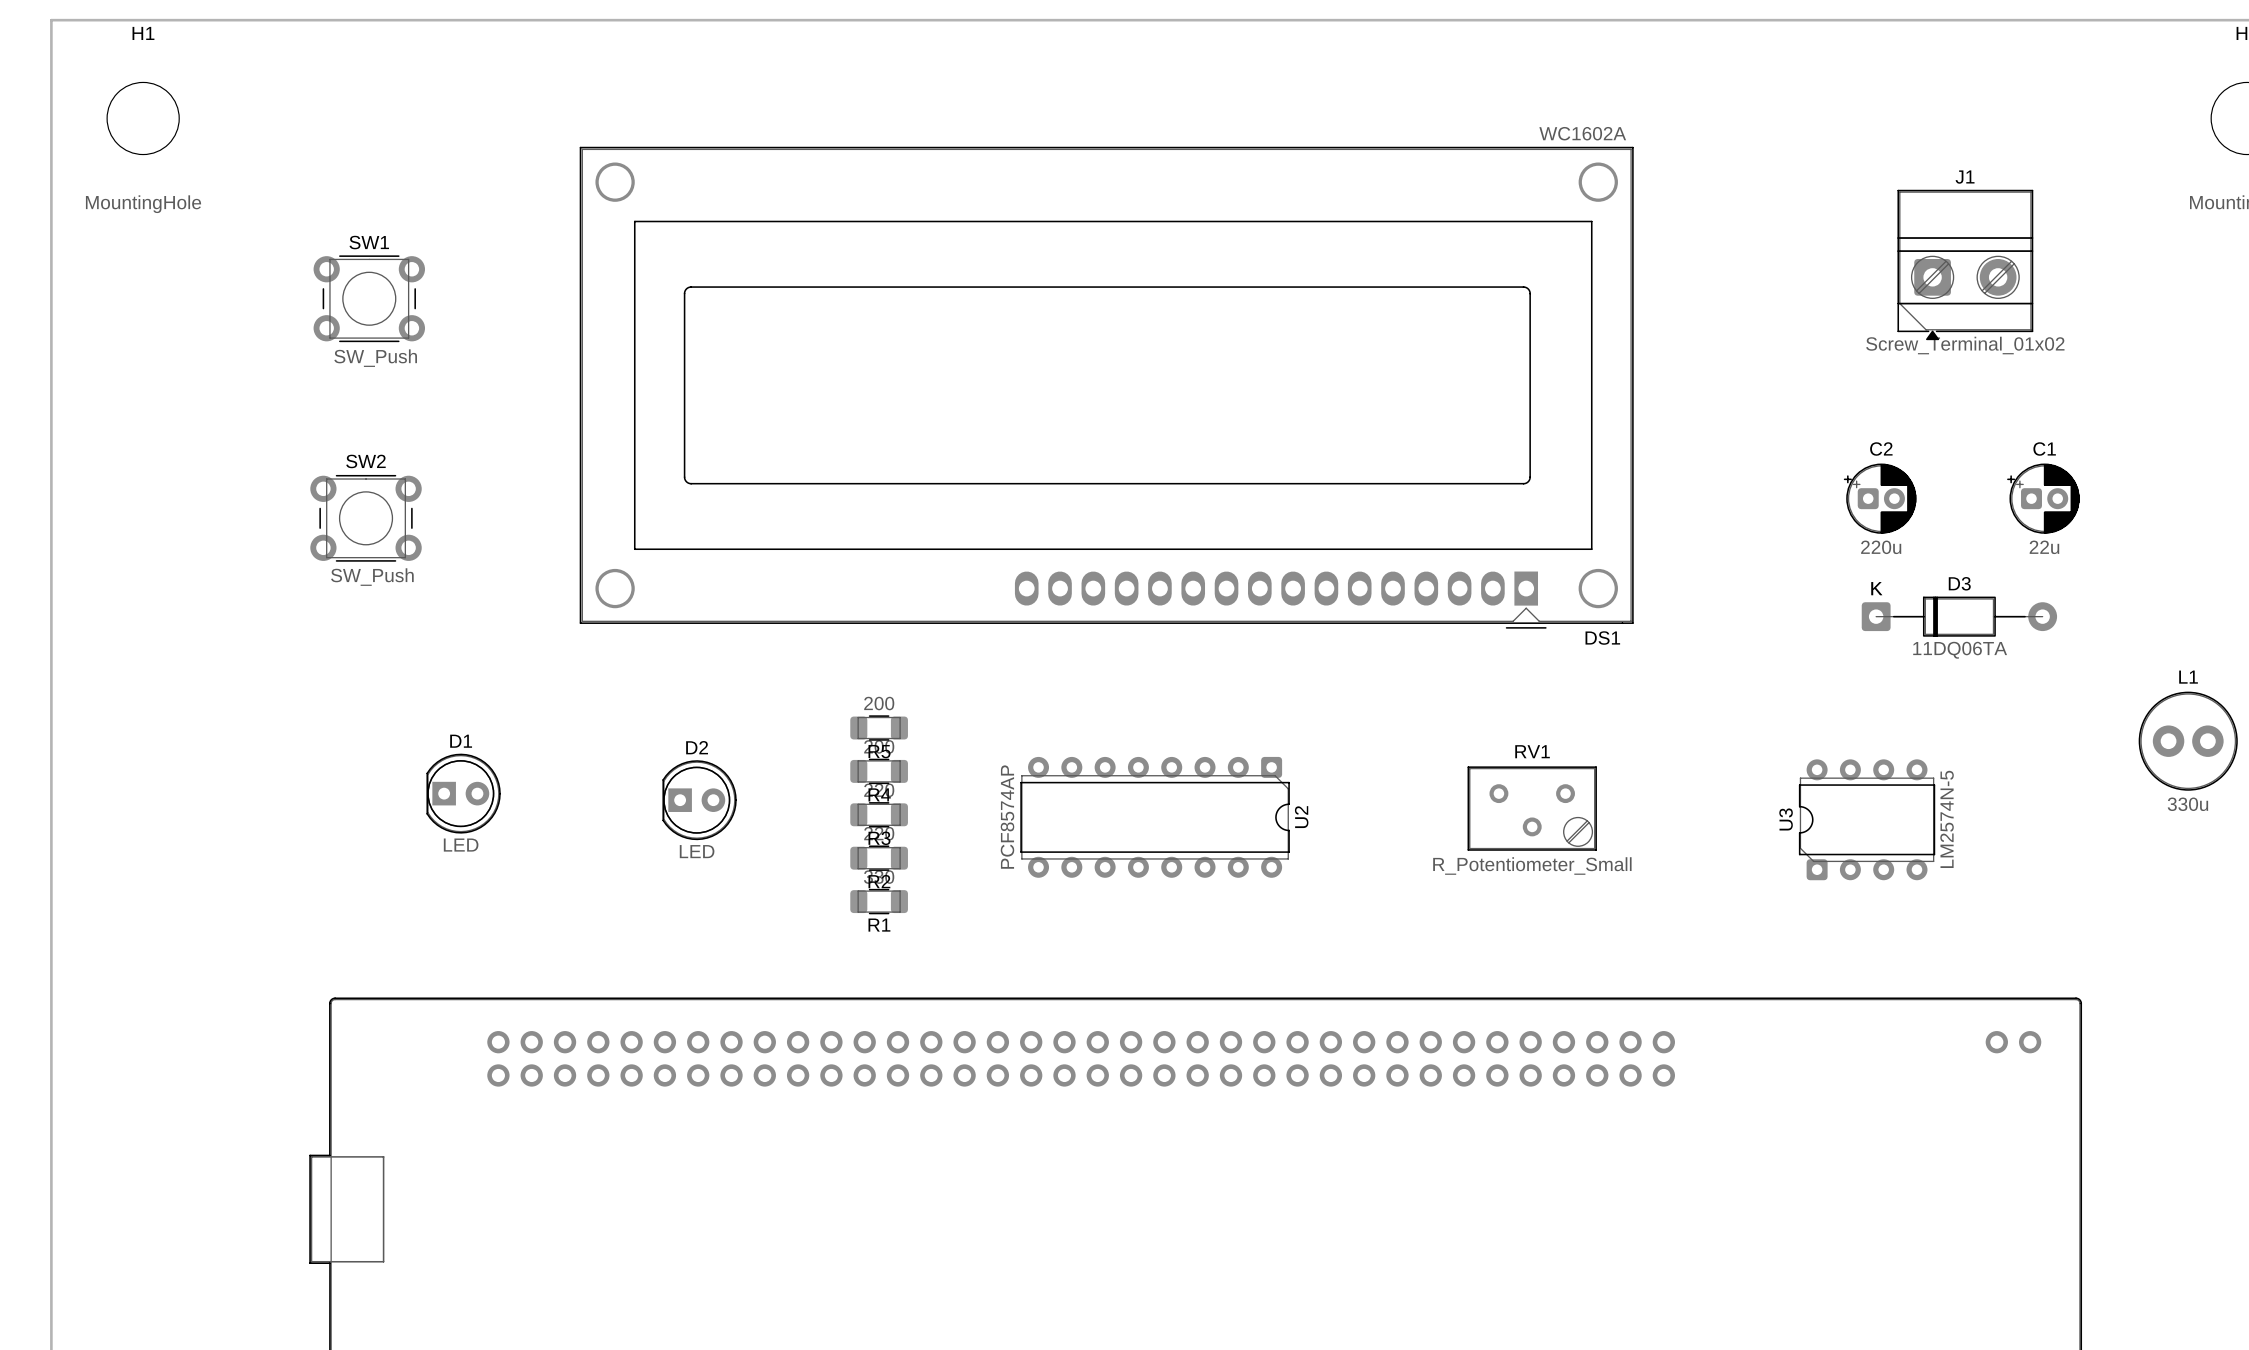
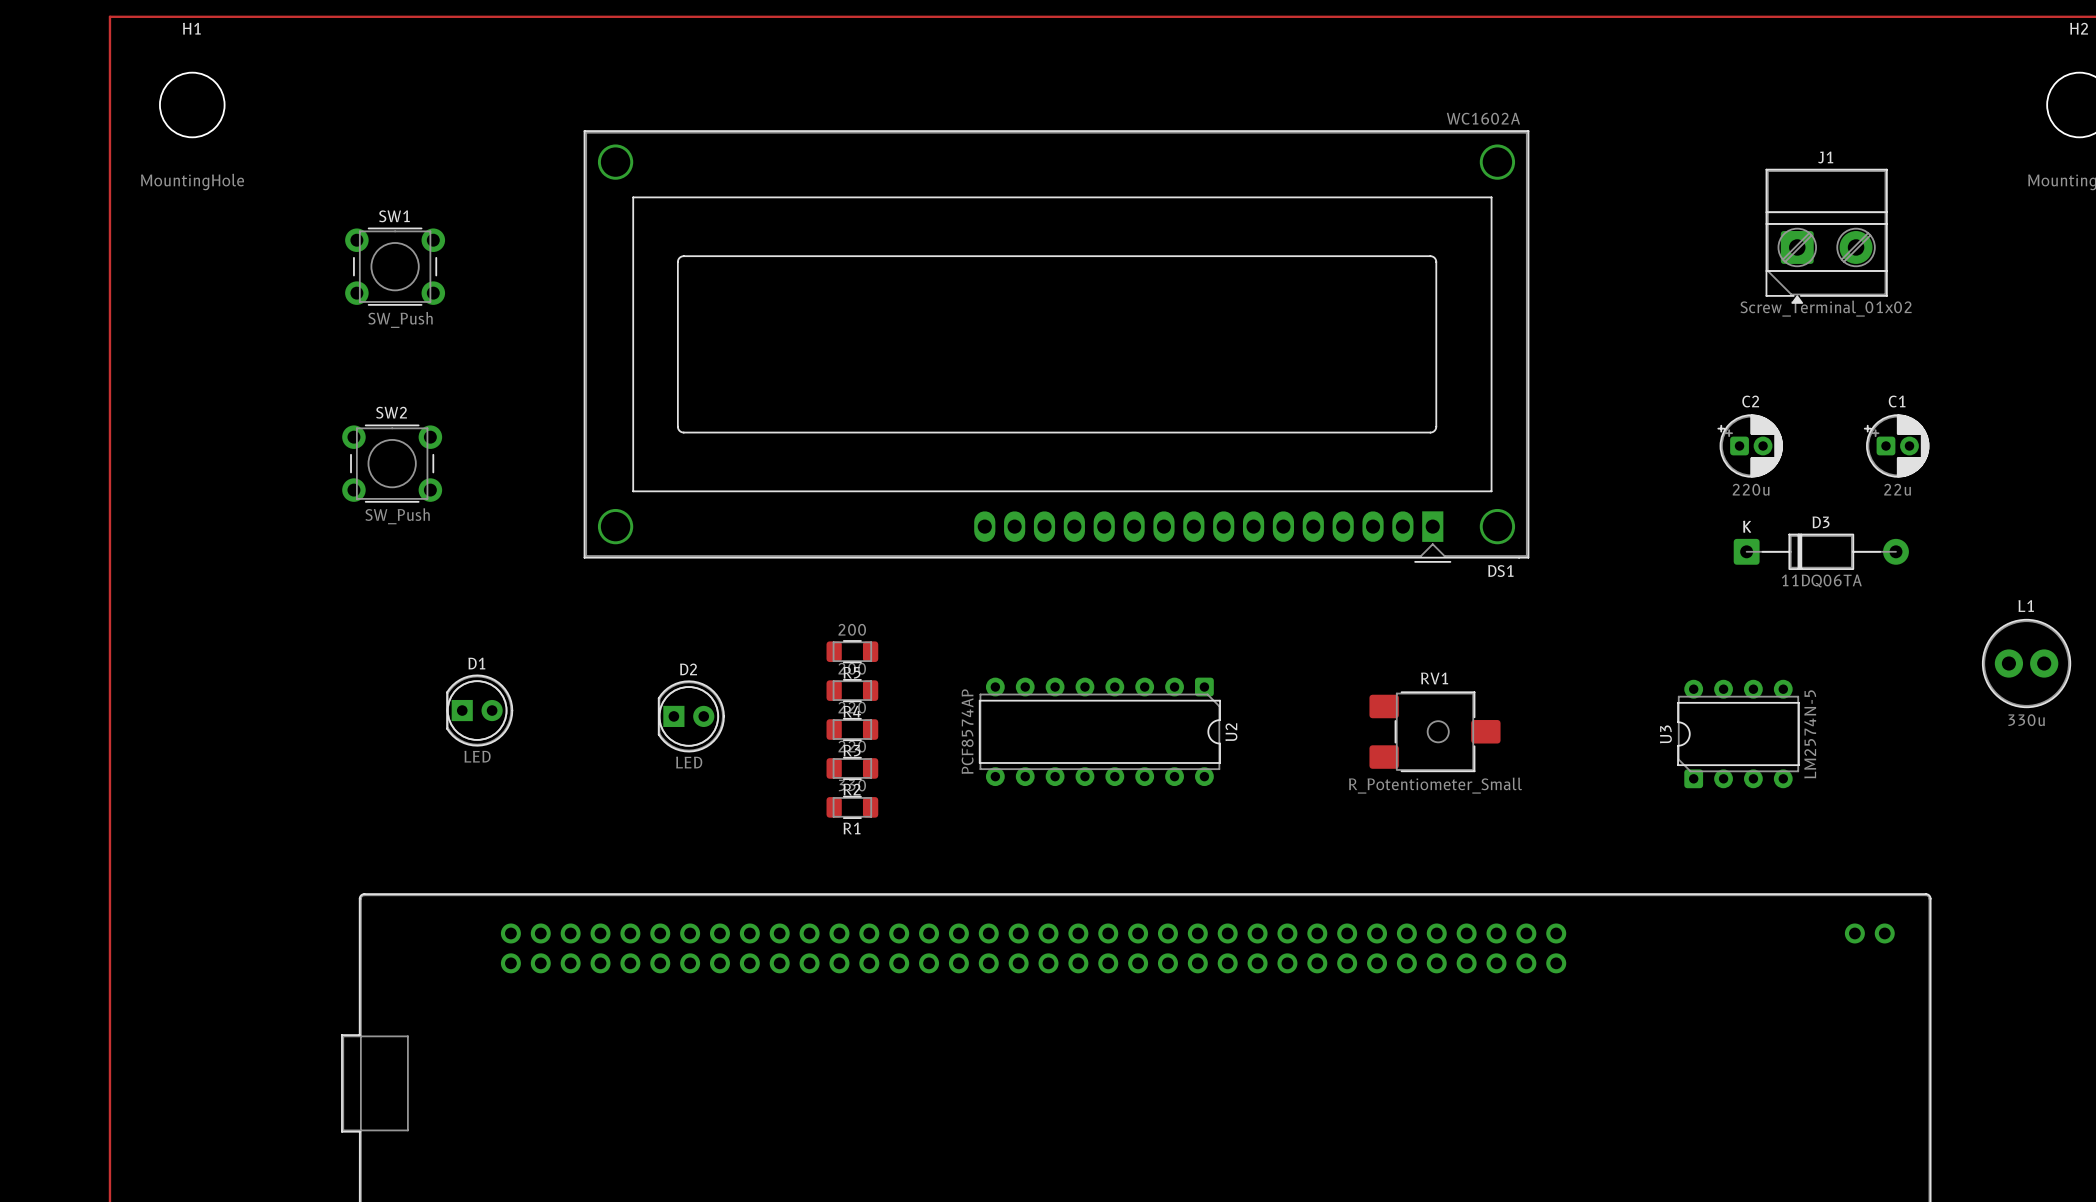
RV1 footprint: [1467, 766, 1597, 851] -> [1369, 691, 1501, 772]

